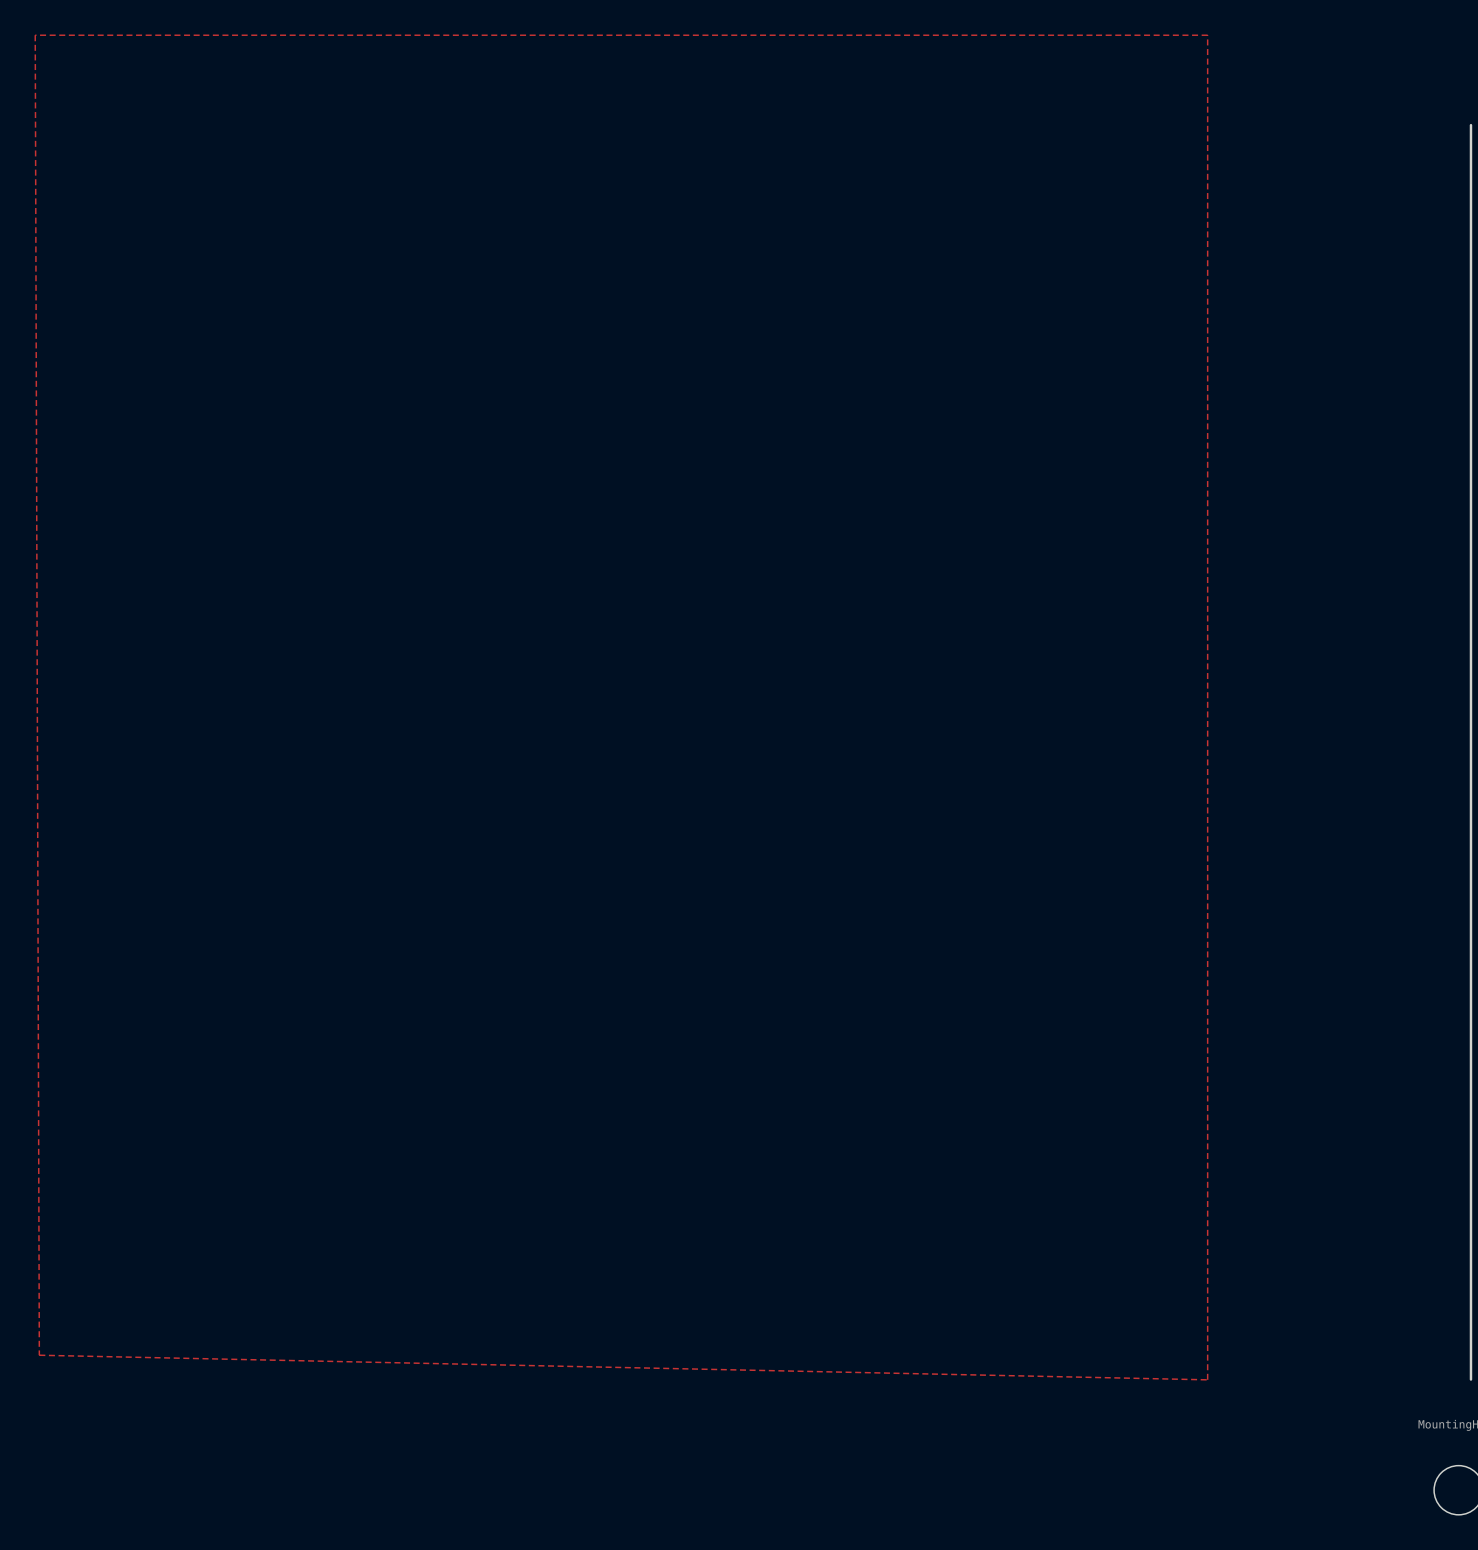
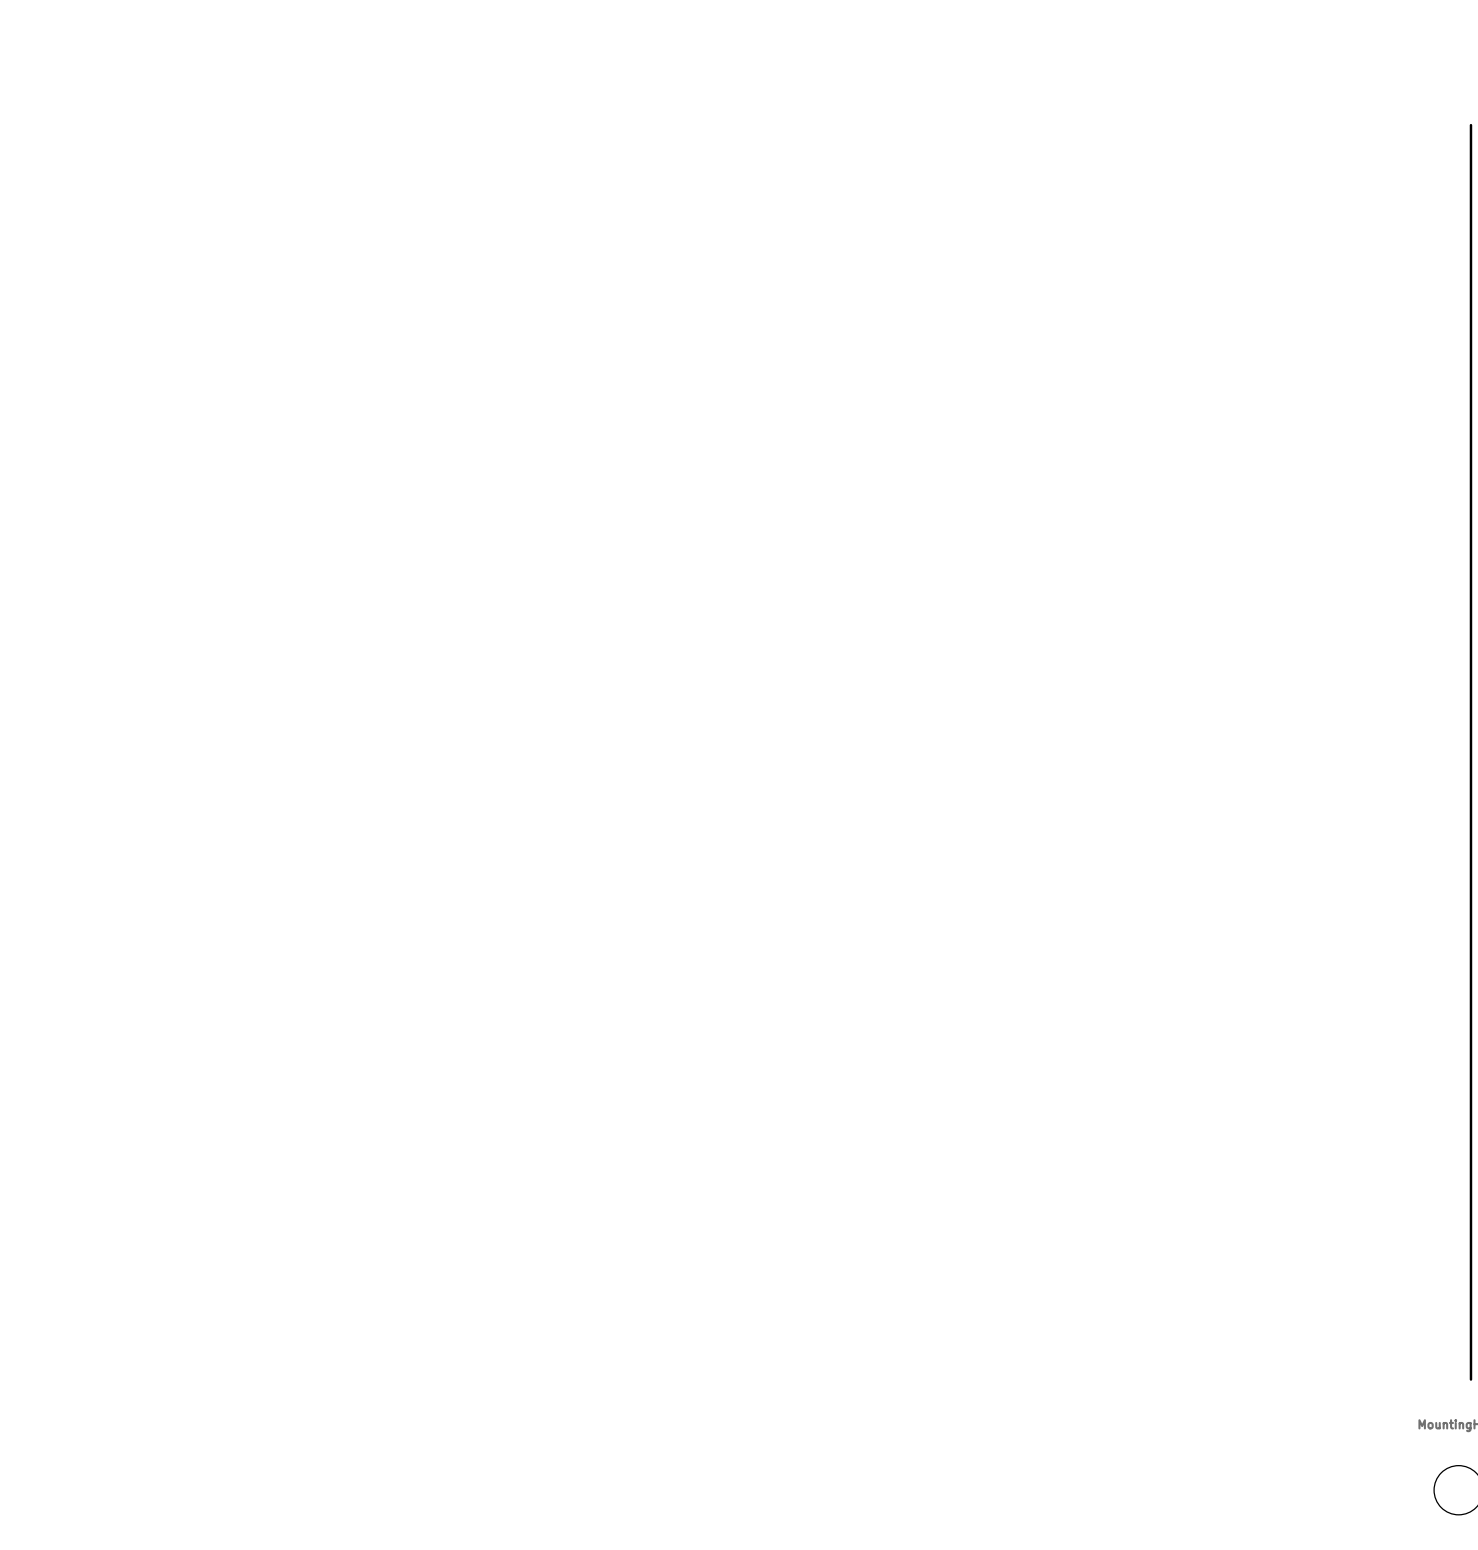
top zone outline: (35, 35) (1207, 35) (1207, 1379) (39, 1355) (35, 35) -> none

